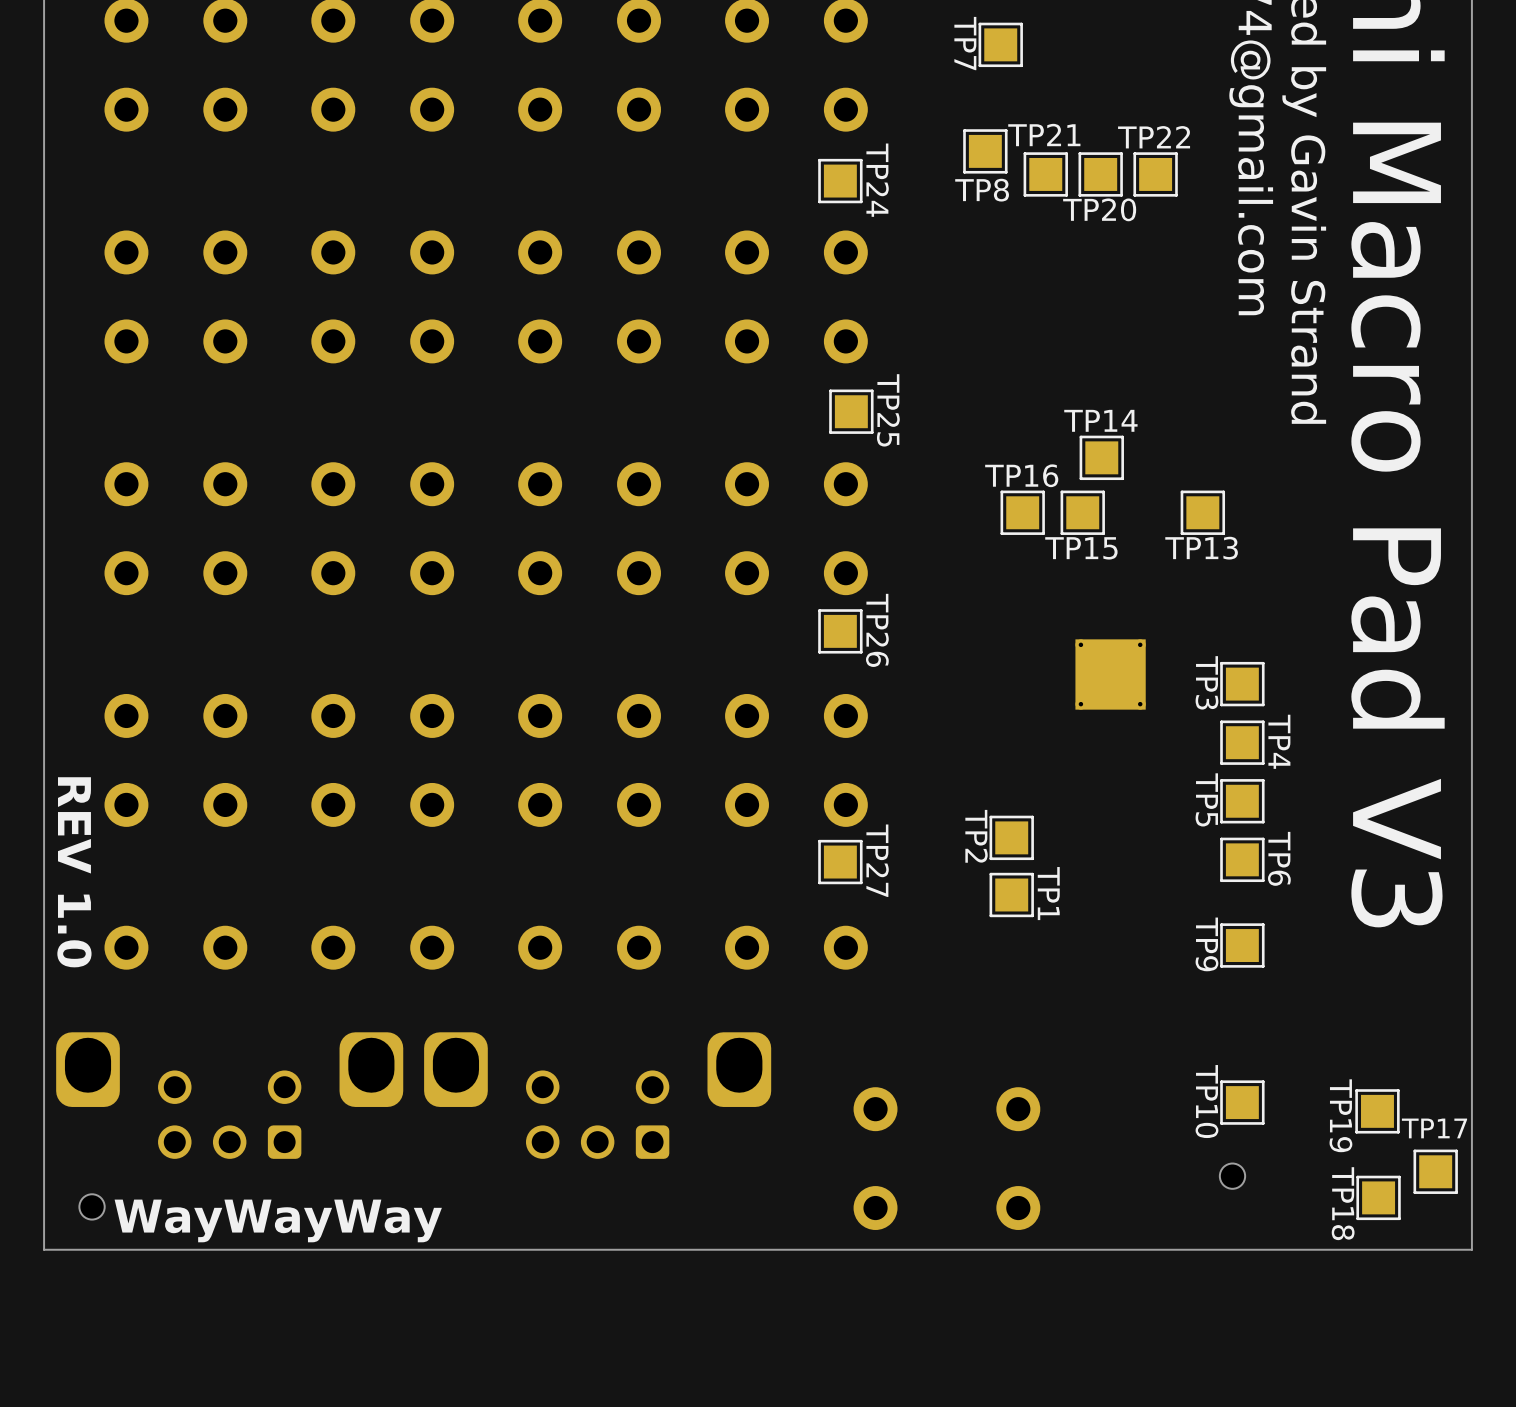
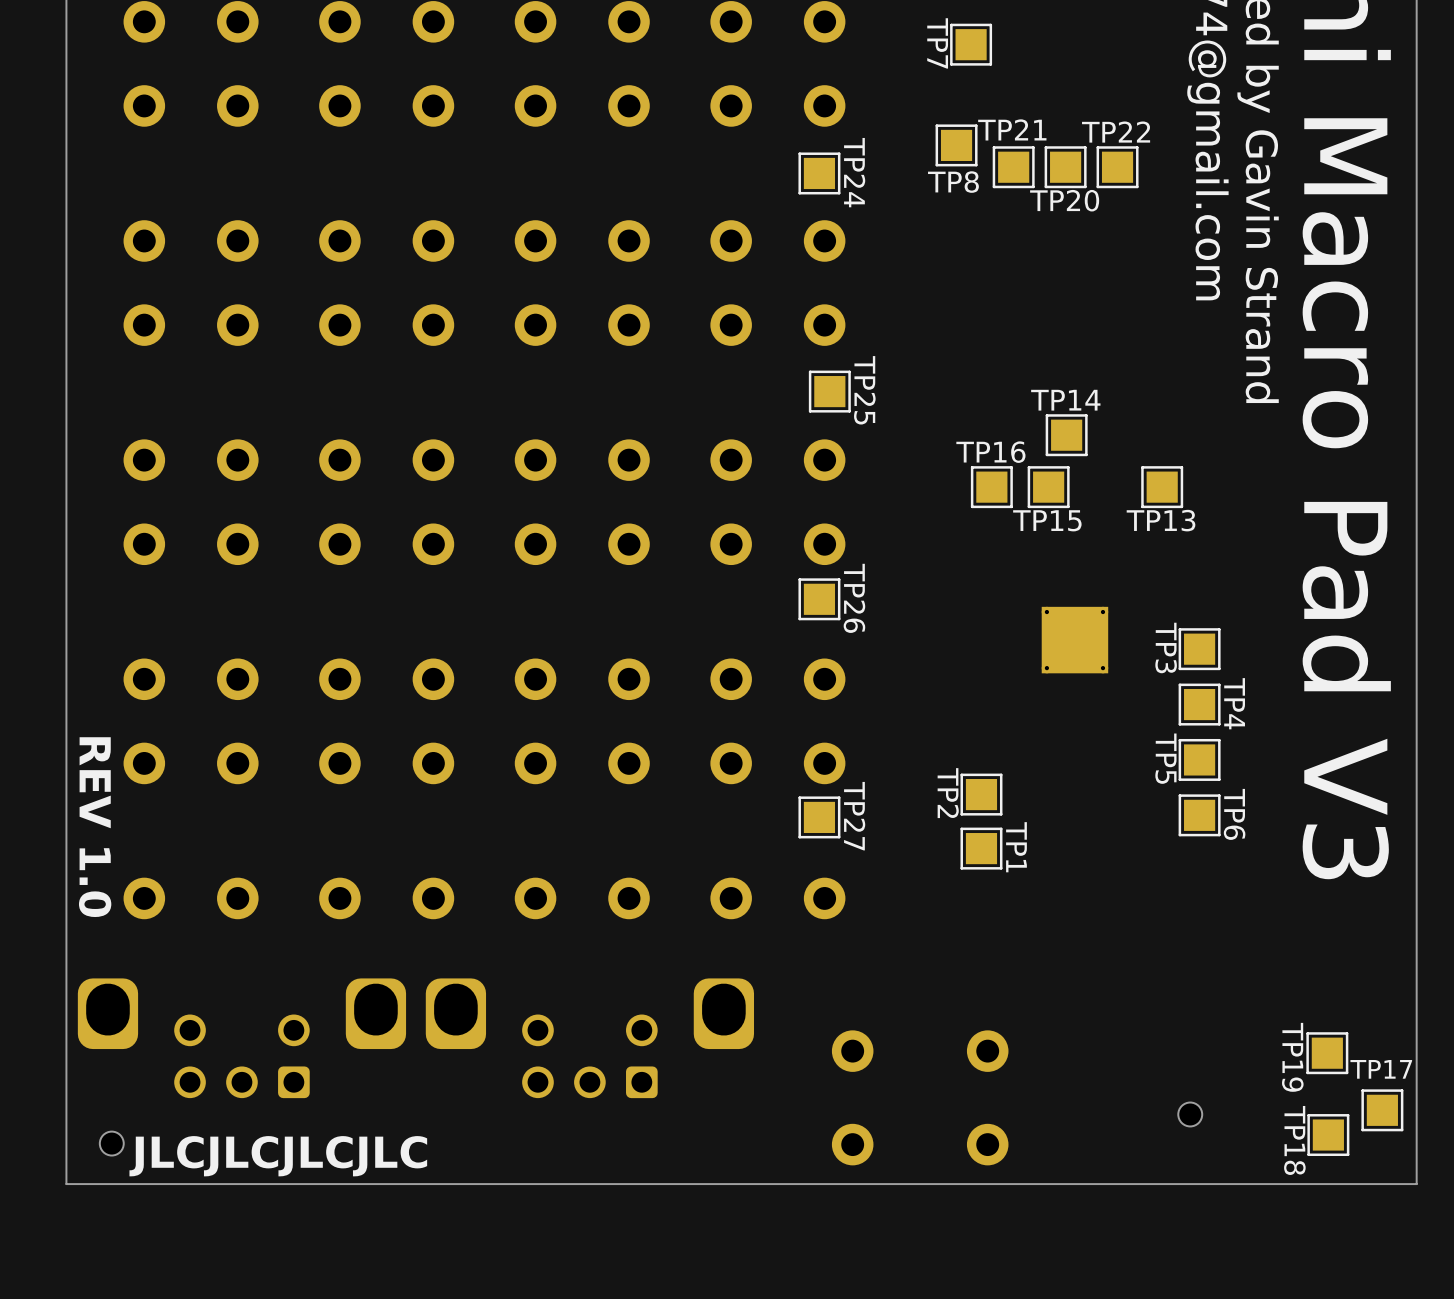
TP9: (1242, 945) -> none
TP10: (1242, 1102) -> none
text: WayWayWay (278, 1220) -> JLCJLCJLCJLC (278, 1156)

